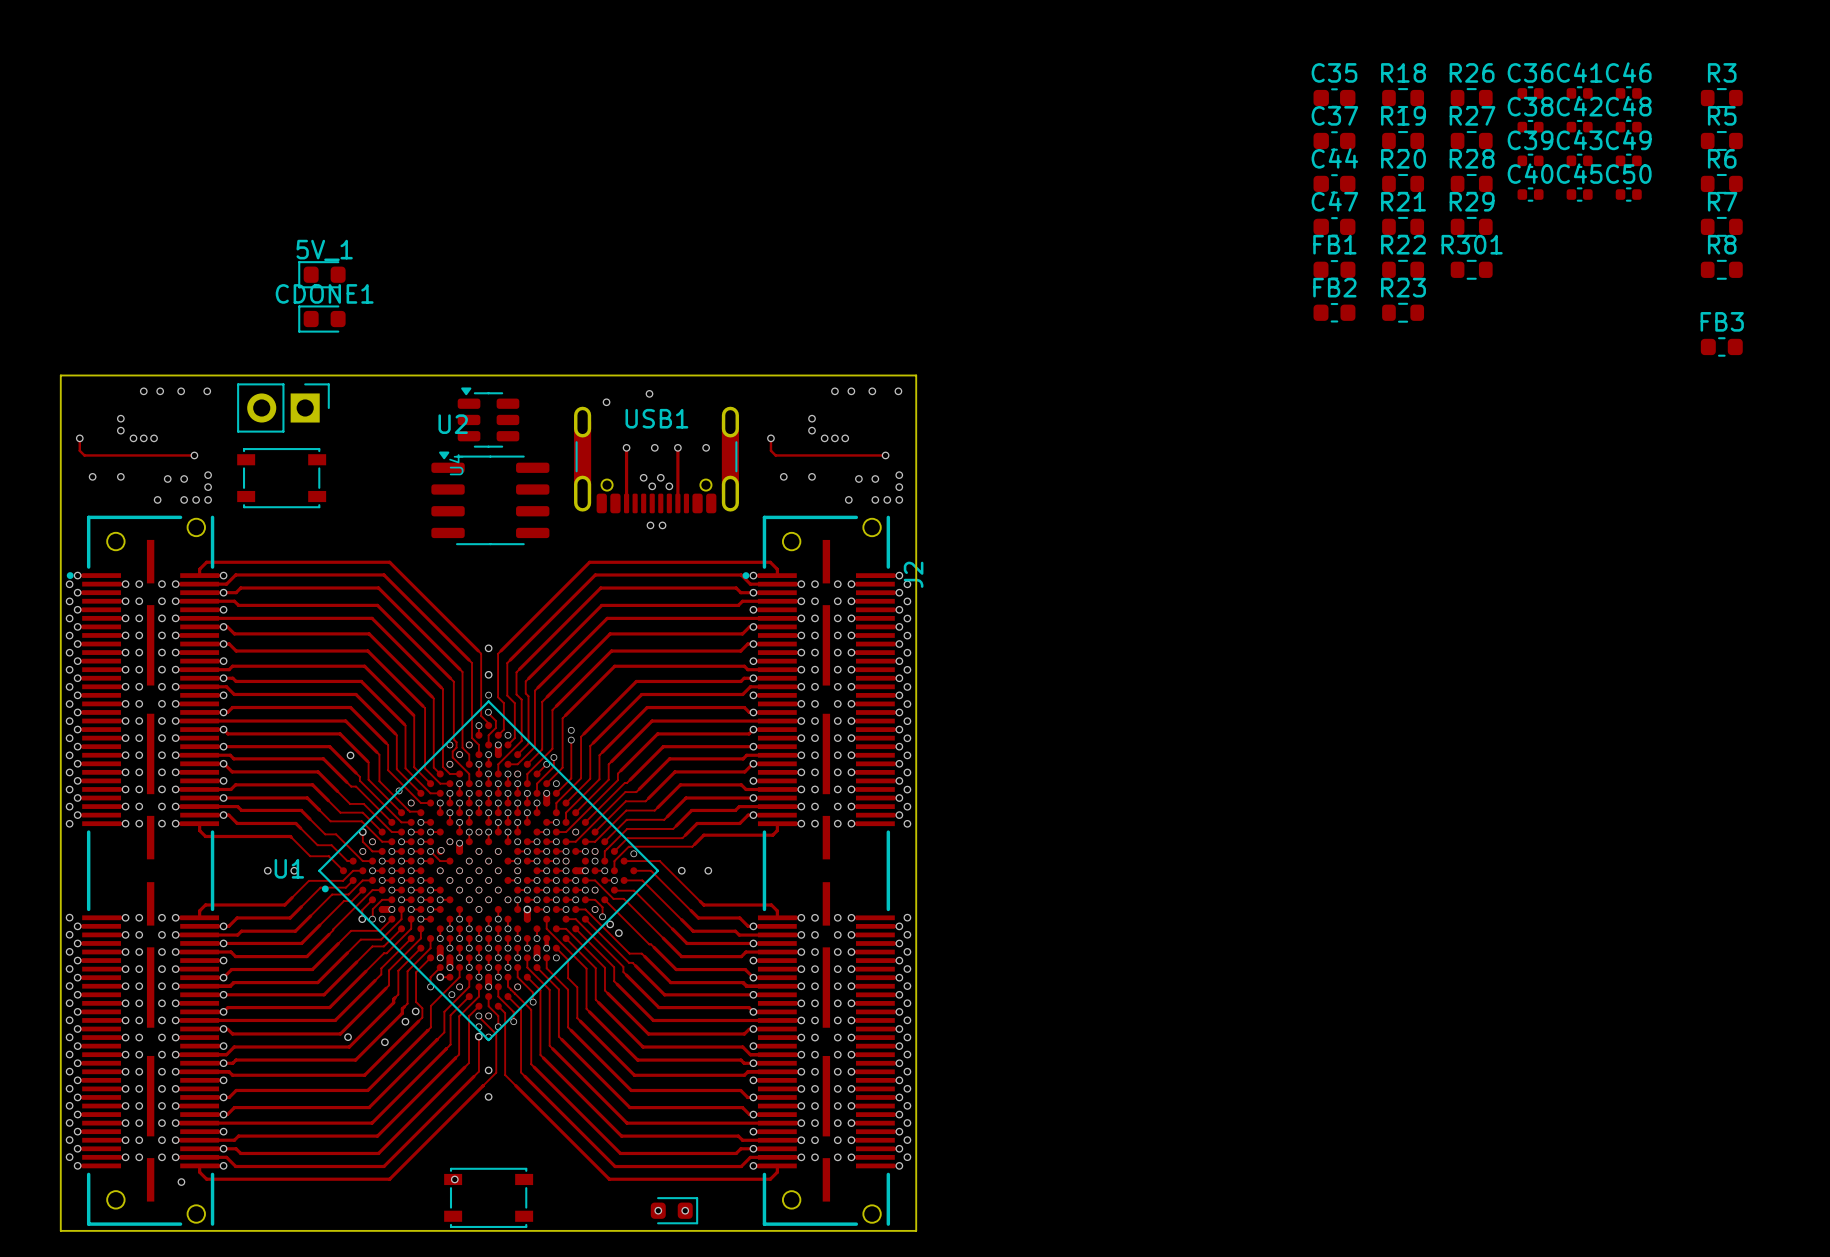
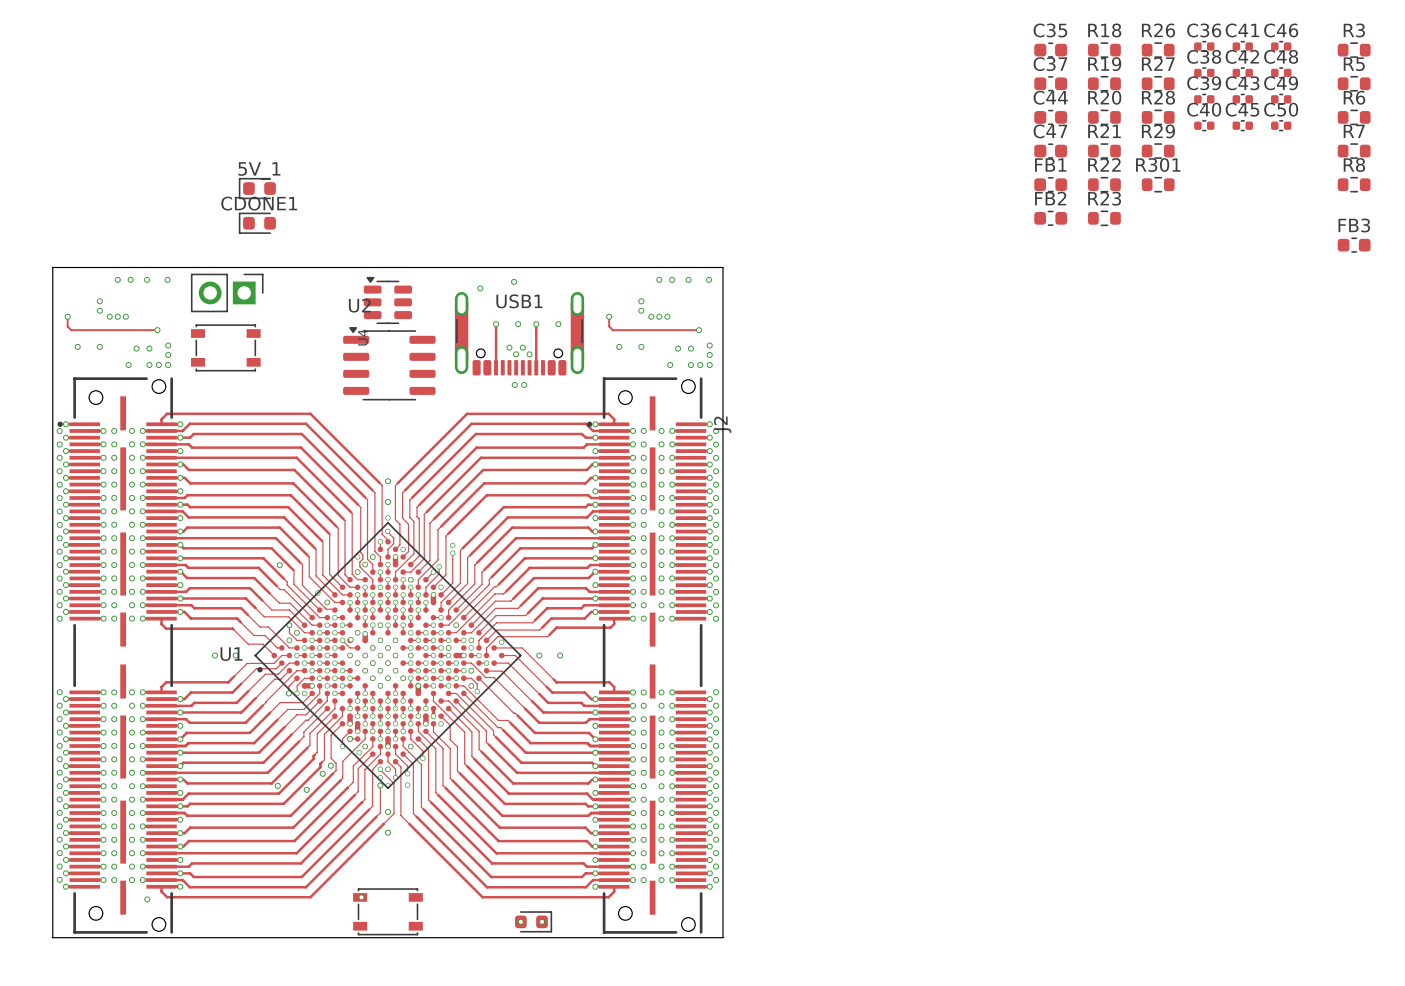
via: (610, 924) -> none
via: (618, 933) -> none
via: none -> (407, 785)

